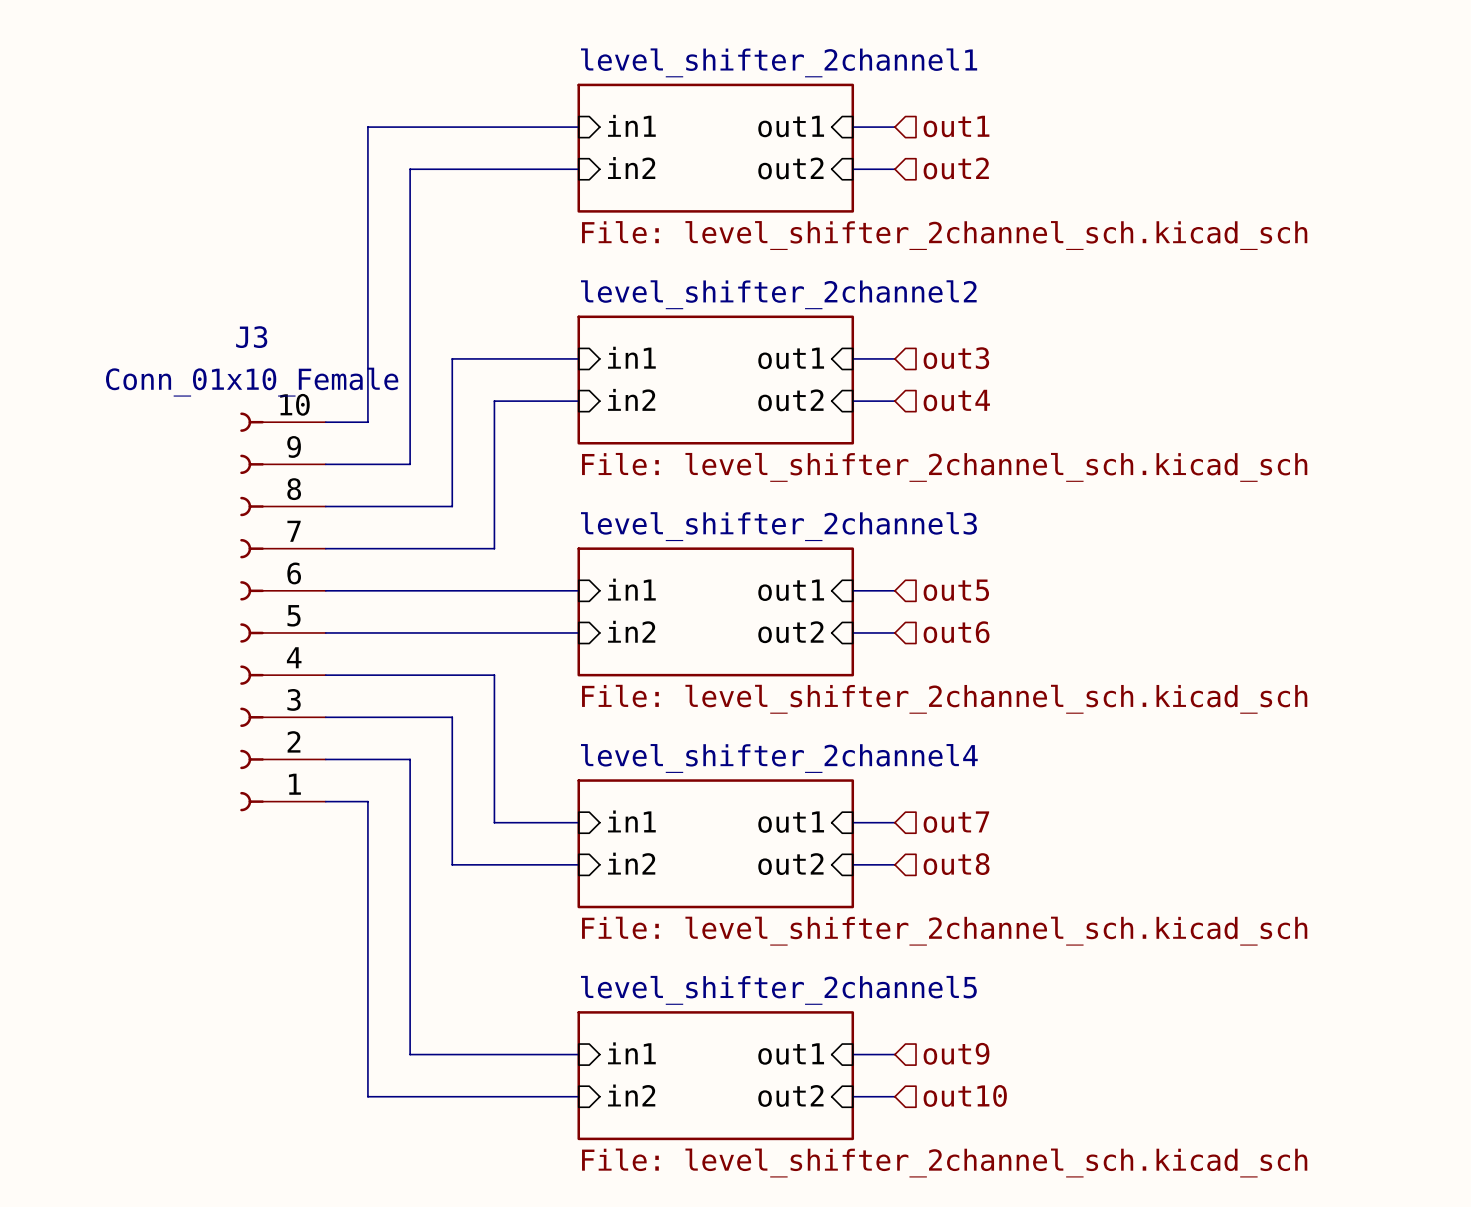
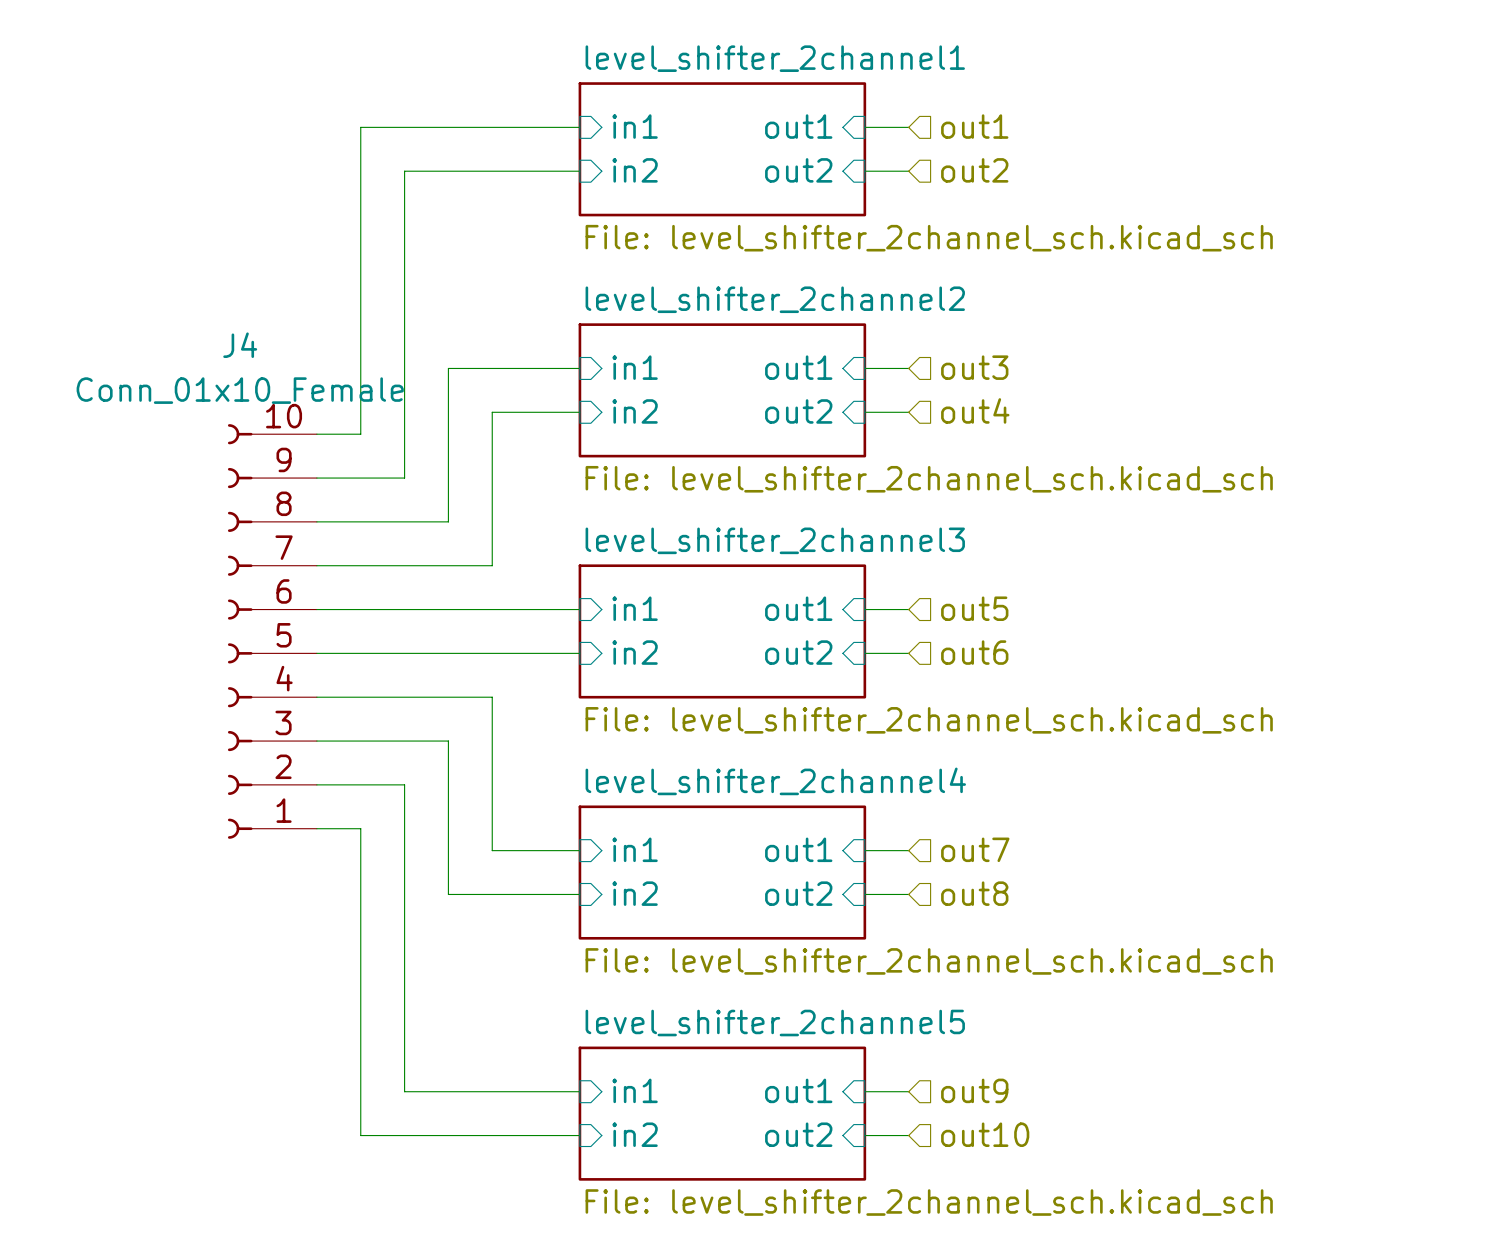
J3 name: J3 (251, 337) -> J4 (240, 345)

